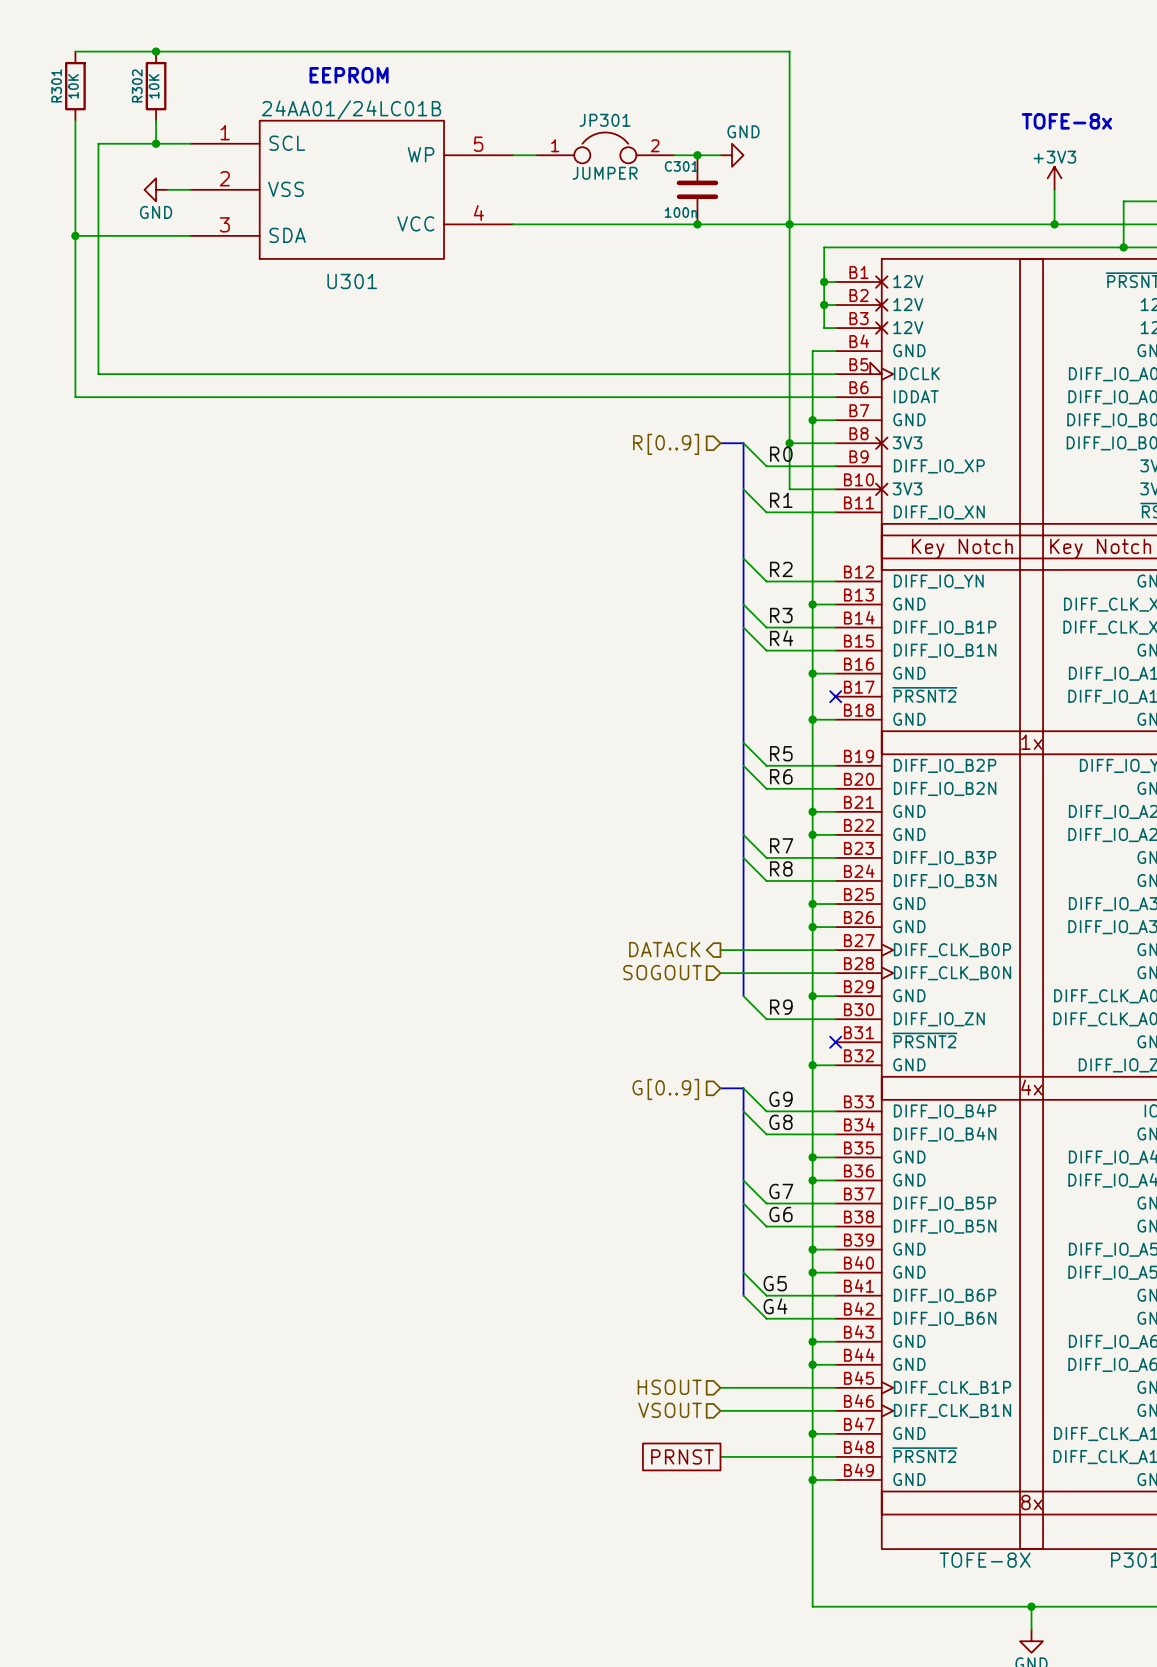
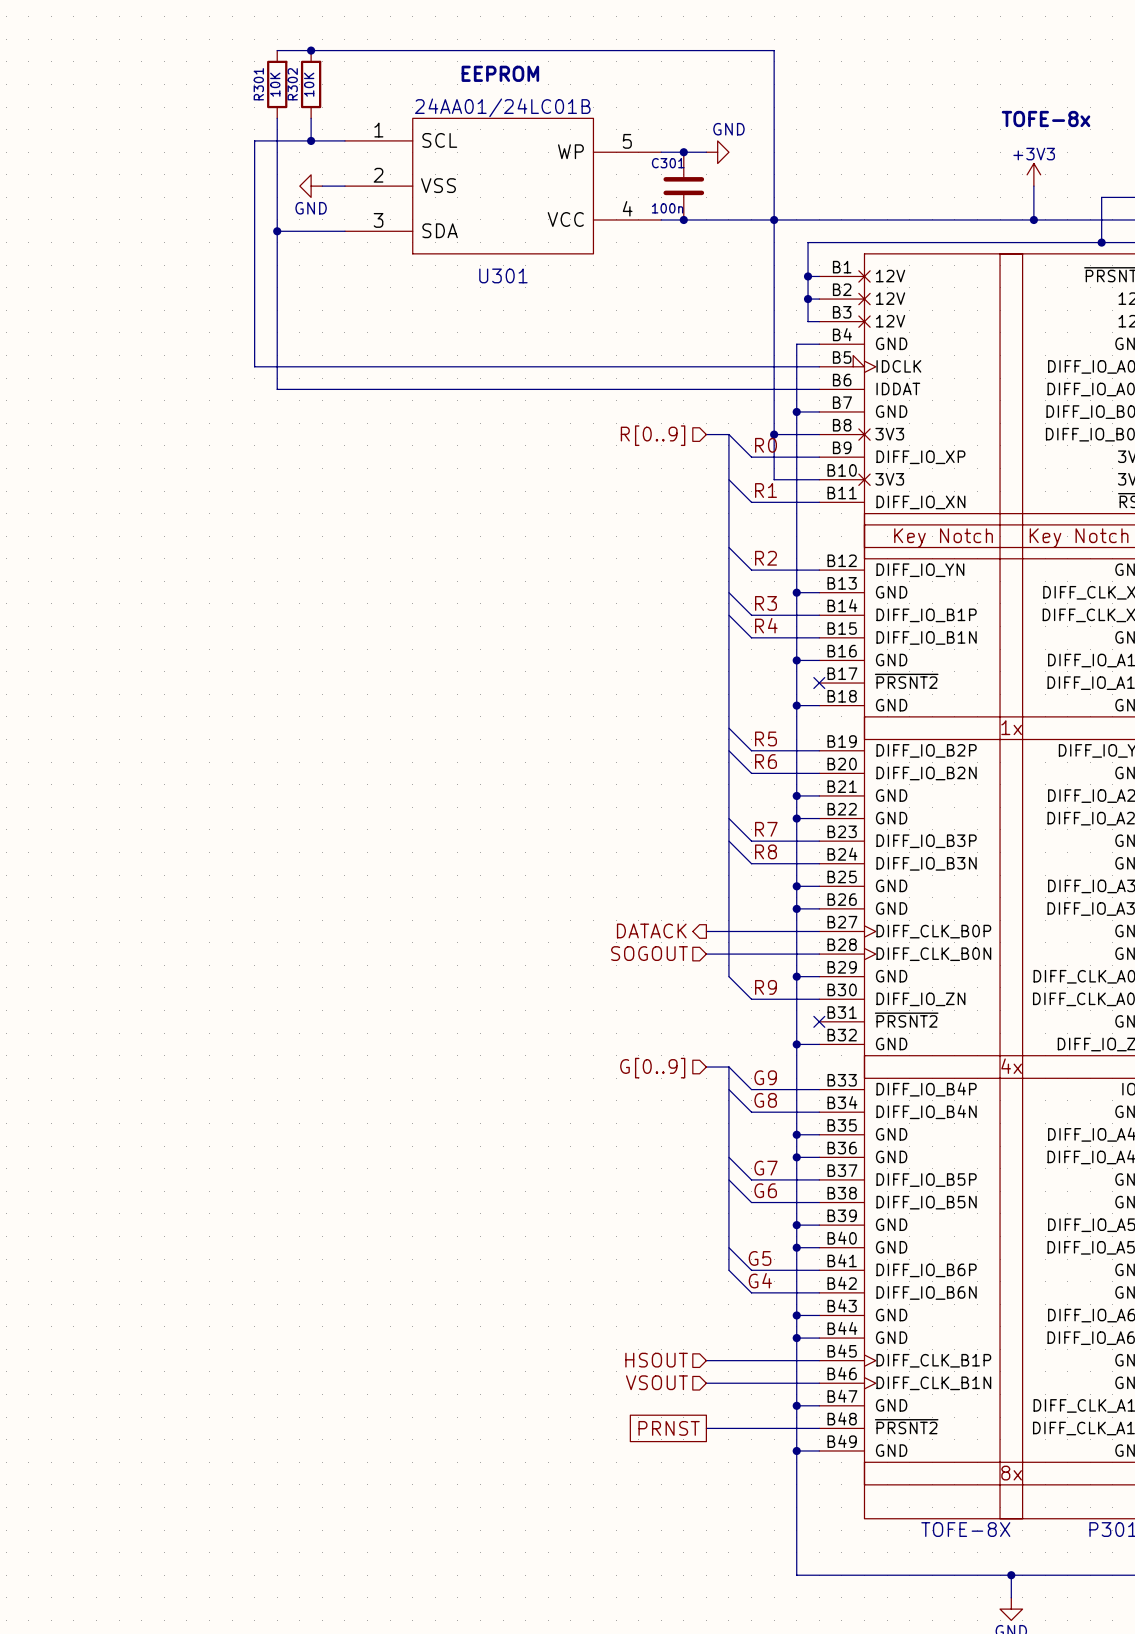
wire: (75, 51) (282, 51) -> none
junction: (156, 51) -> none
junction: none -> (311, 50)
text position: EEPROM (349, 75) -> EEPROM (500, 73)
R301 position: (75, 86) -> (277, 84)
R302 position: (156, 86) -> (311, 84)
wire: (75, 120) (75, 397) (282, 397) -> (277, 118) (277, 389)
wire: (156, 120) (156, 143) -> (311, 118) (311, 140)
junction: (156, 143) -> none
wire: (190, 143) (98, 143) (98, 374) (259, 374) -> (344, 140) (254, 140) (254, 366)
junction: none -> (311, 140)
JP301: JUMPER (605, 147) -> none
wire: (513, 155) (536, 155) -> none
power symbol position: GND (156, 189) -> GND (311, 186)
wire: (167, 189) (190, 189) -> (322, 186) (344, 186)
U301 position: (351, 189) -> (503, 186)
wire: (513, 224) (674, 224) -> none
wire: (75, 235) (190, 235) -> none
junction: (75, 235) -> none
wire: none -> (277, 231) (344, 231)
junction: none -> (277, 231)

